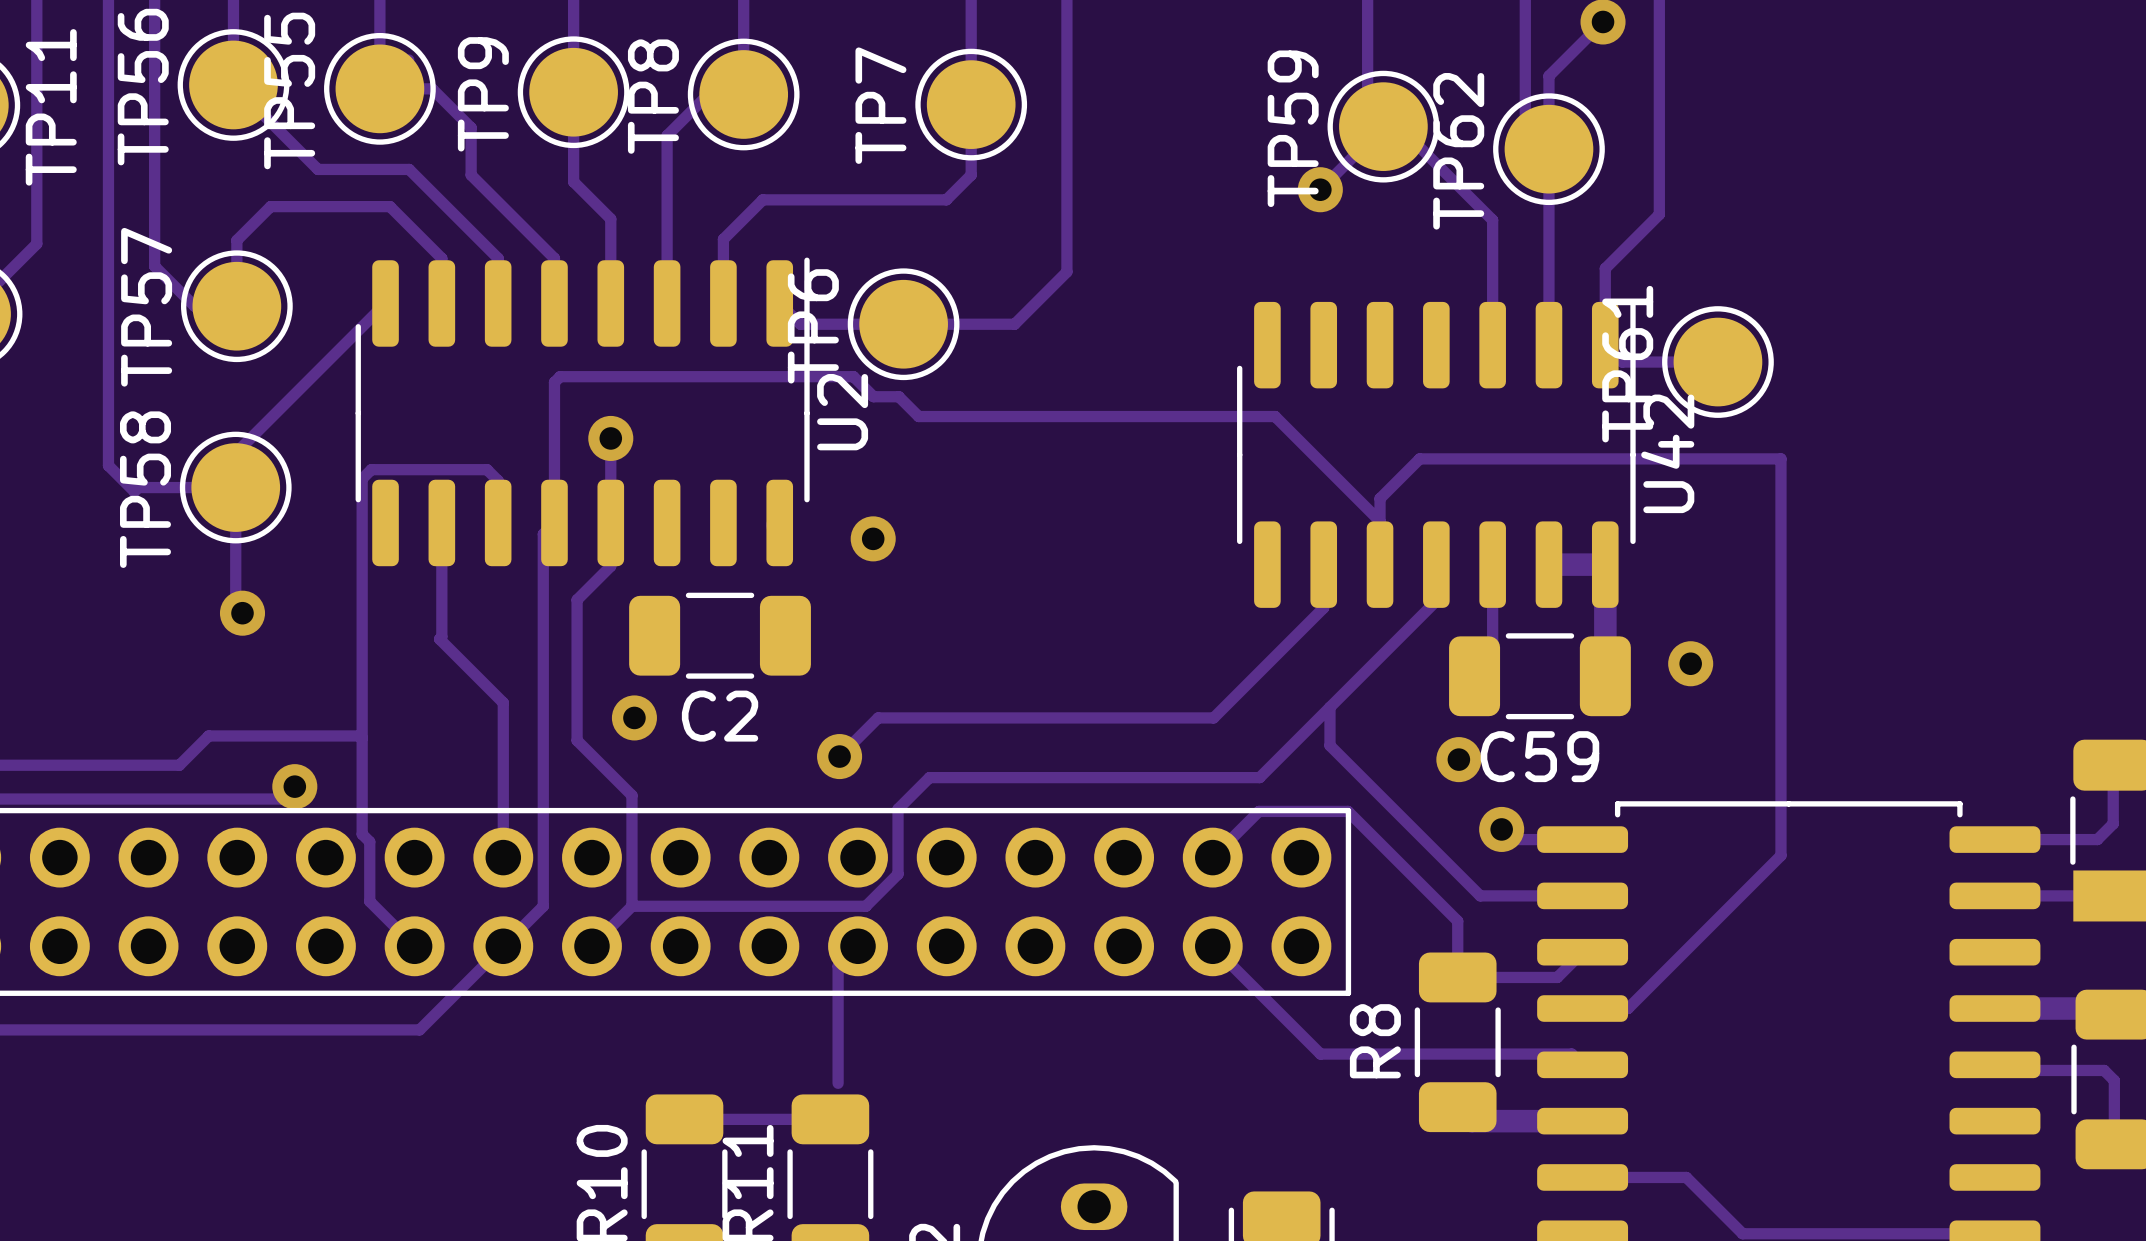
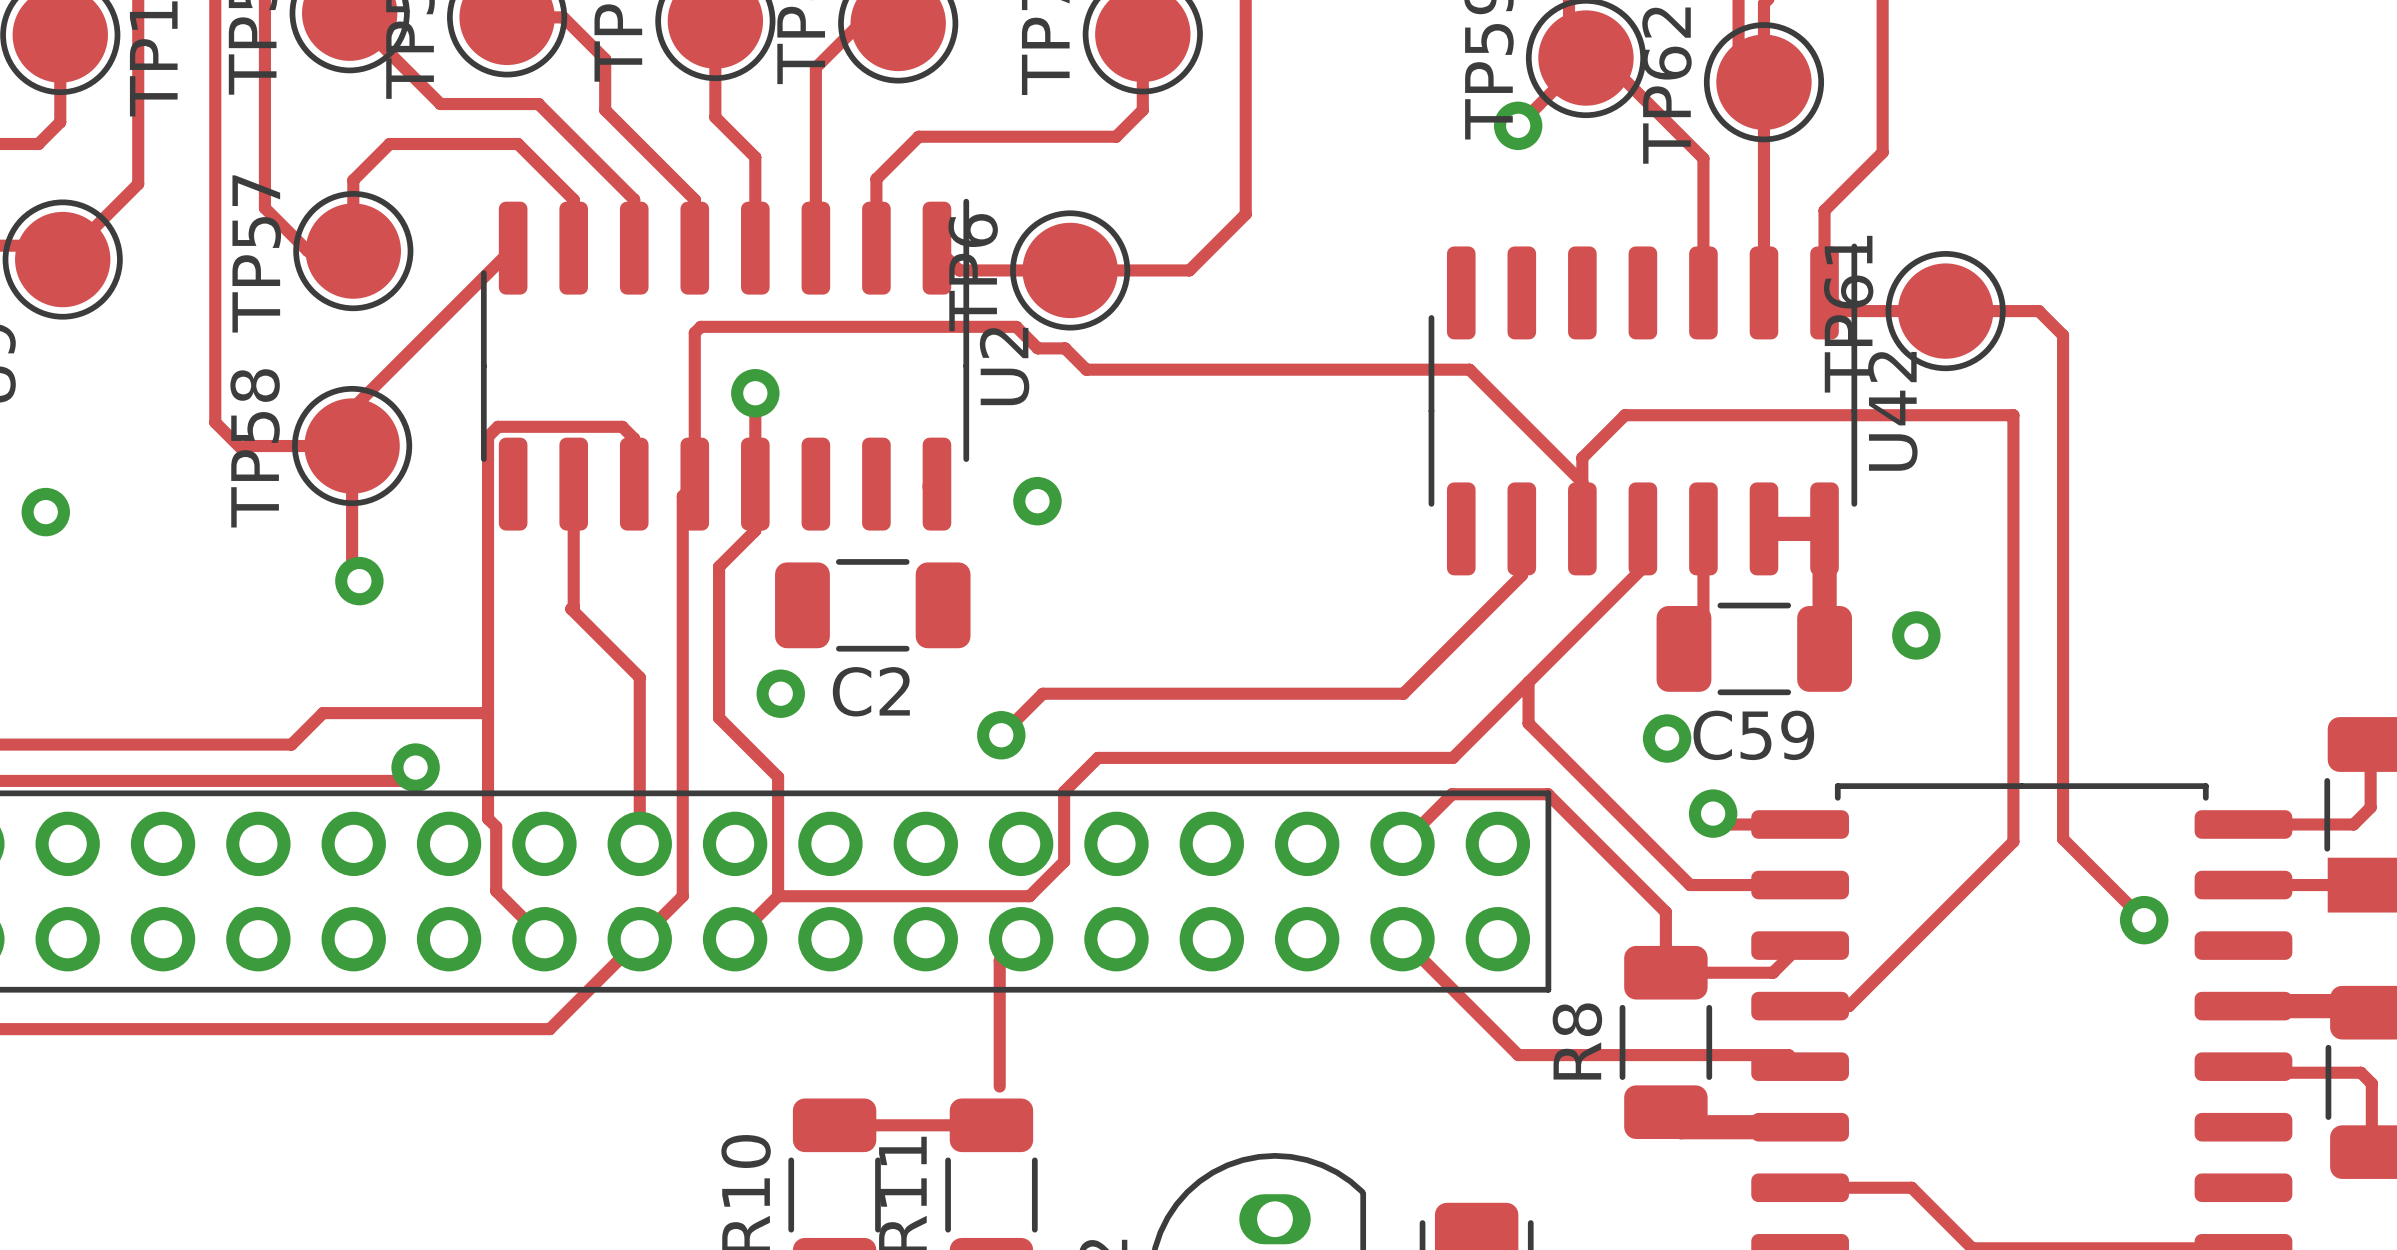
track: none -> (1945, 311) (2038, 311) (2063, 335) (2063, 839) (2144, 920)
via: none -> (2144, 920)

